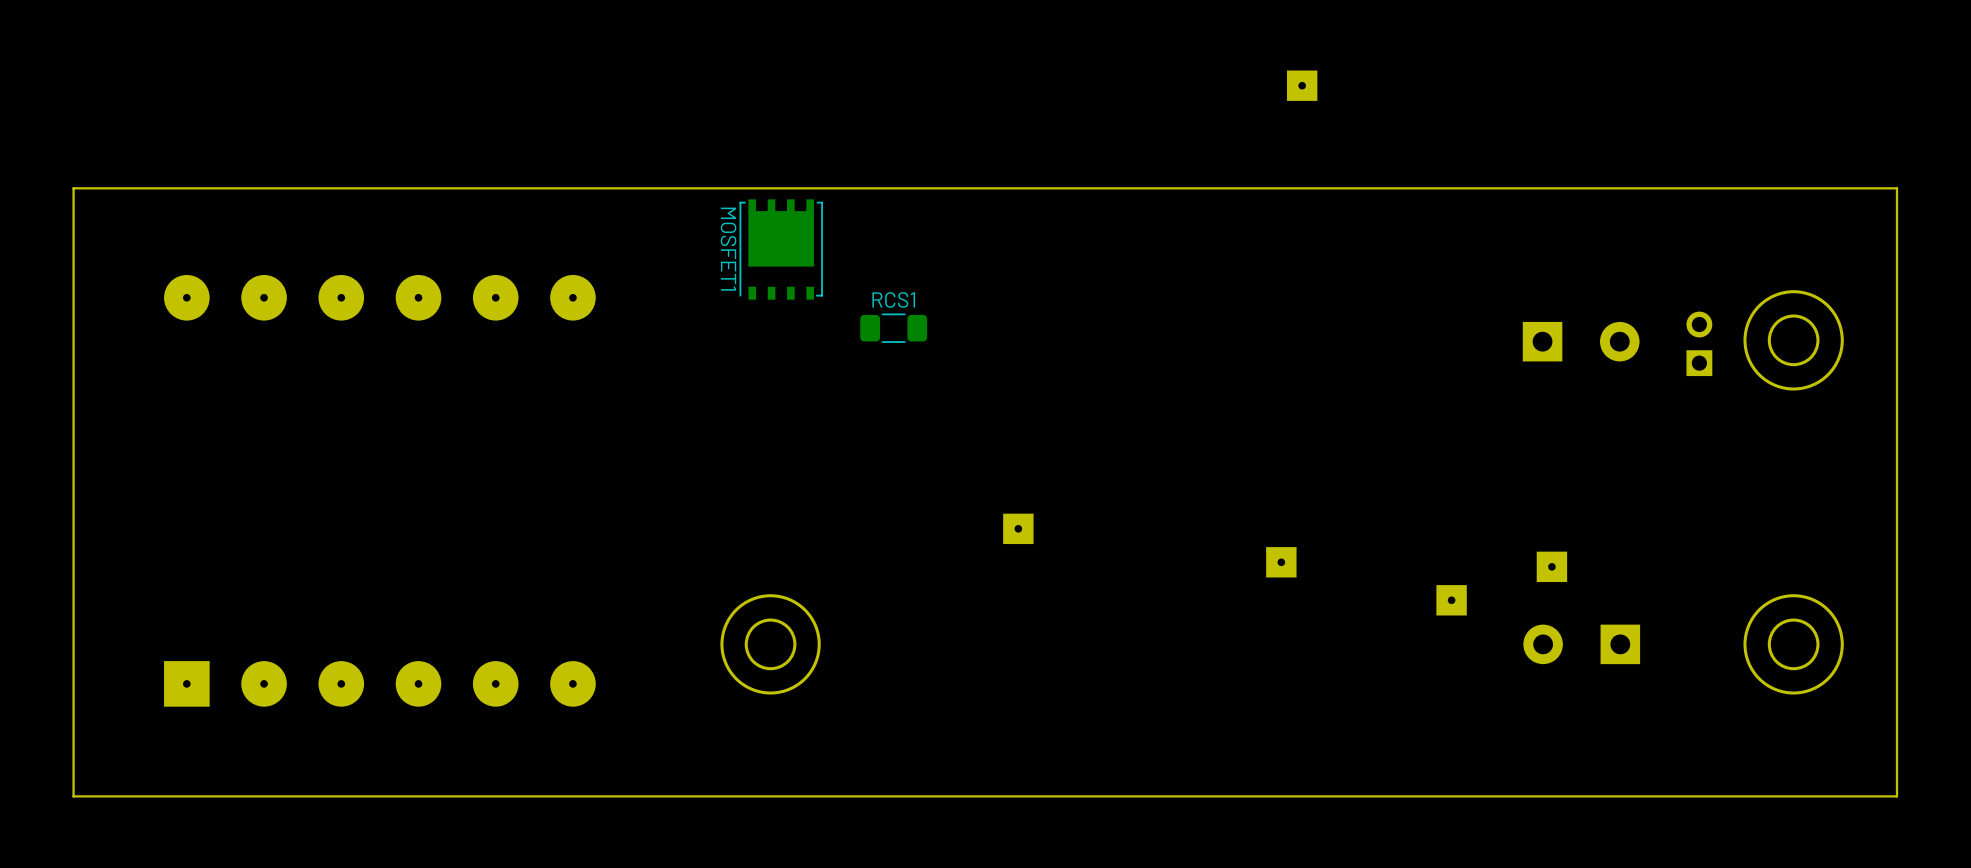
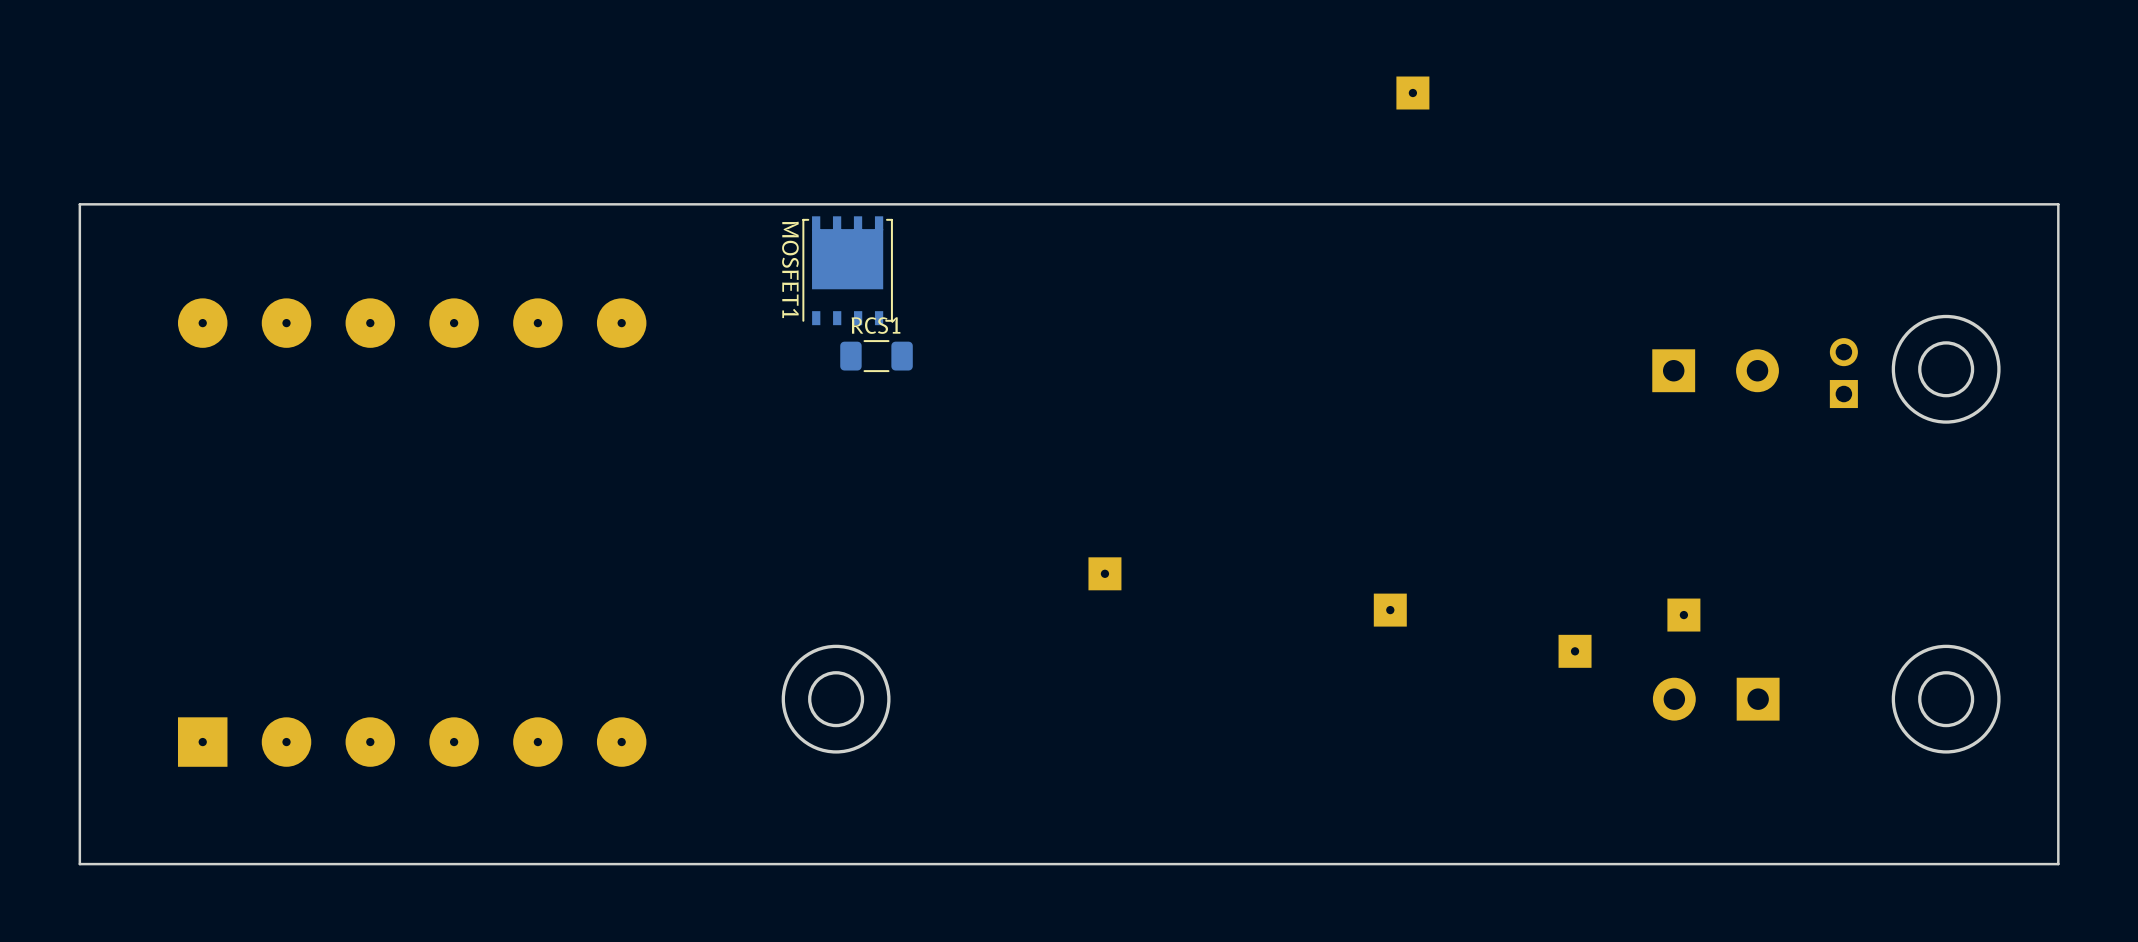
RCS1 position: (893, 328) -> (876, 356)

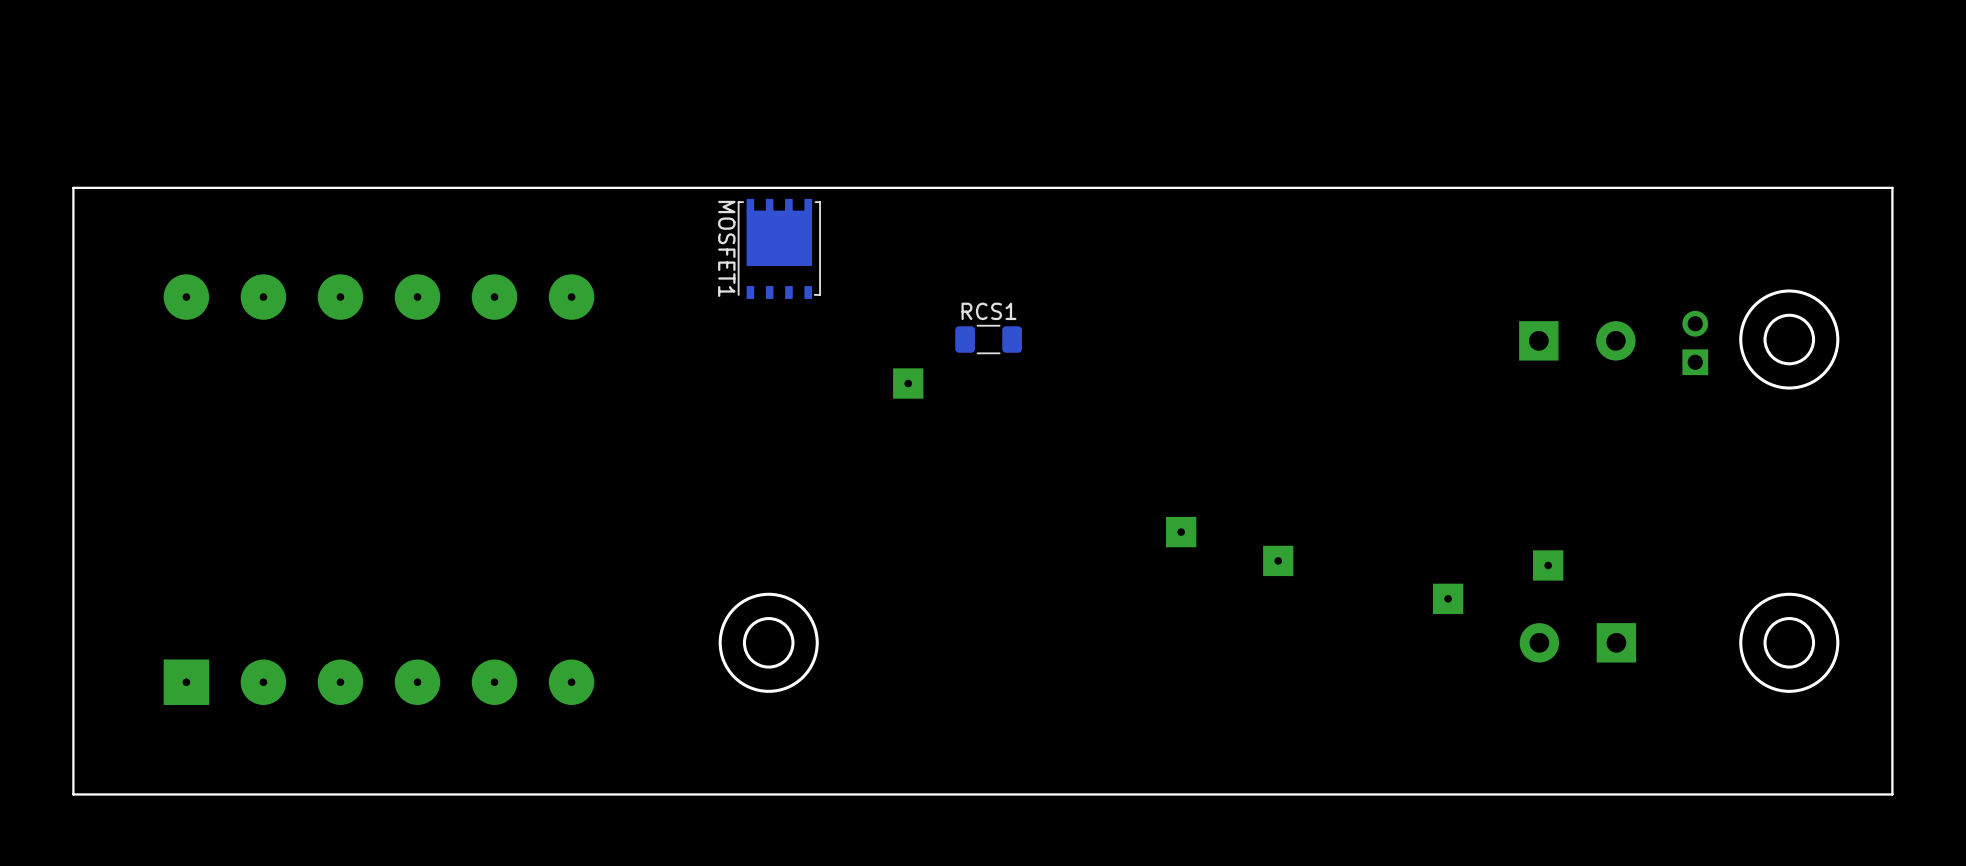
part: (1412, 93) -> none
RCS1 position: (876, 356) -> (988, 339)
part: none -> (908, 383)
part: (1104, 573) -> none
part: none -> (1181, 532)

